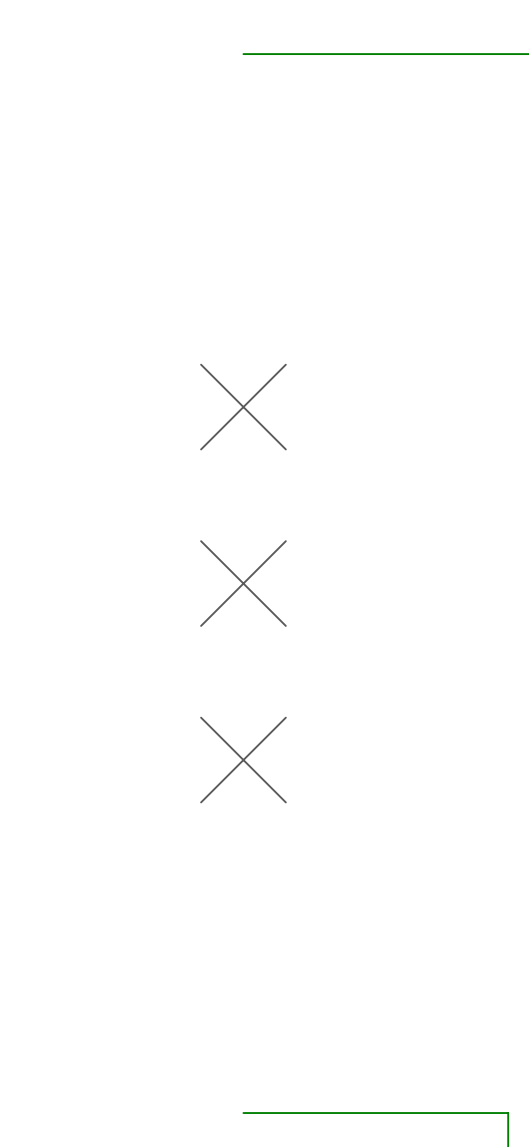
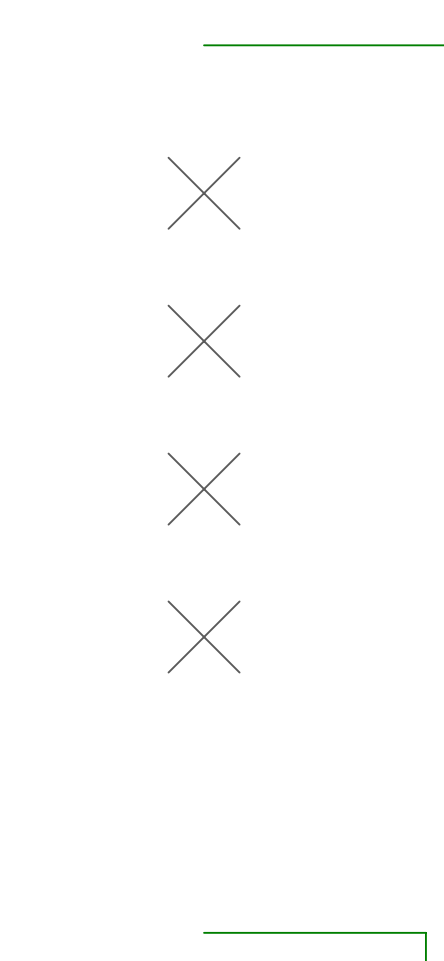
no-connect mark: none -> (204, 193)

